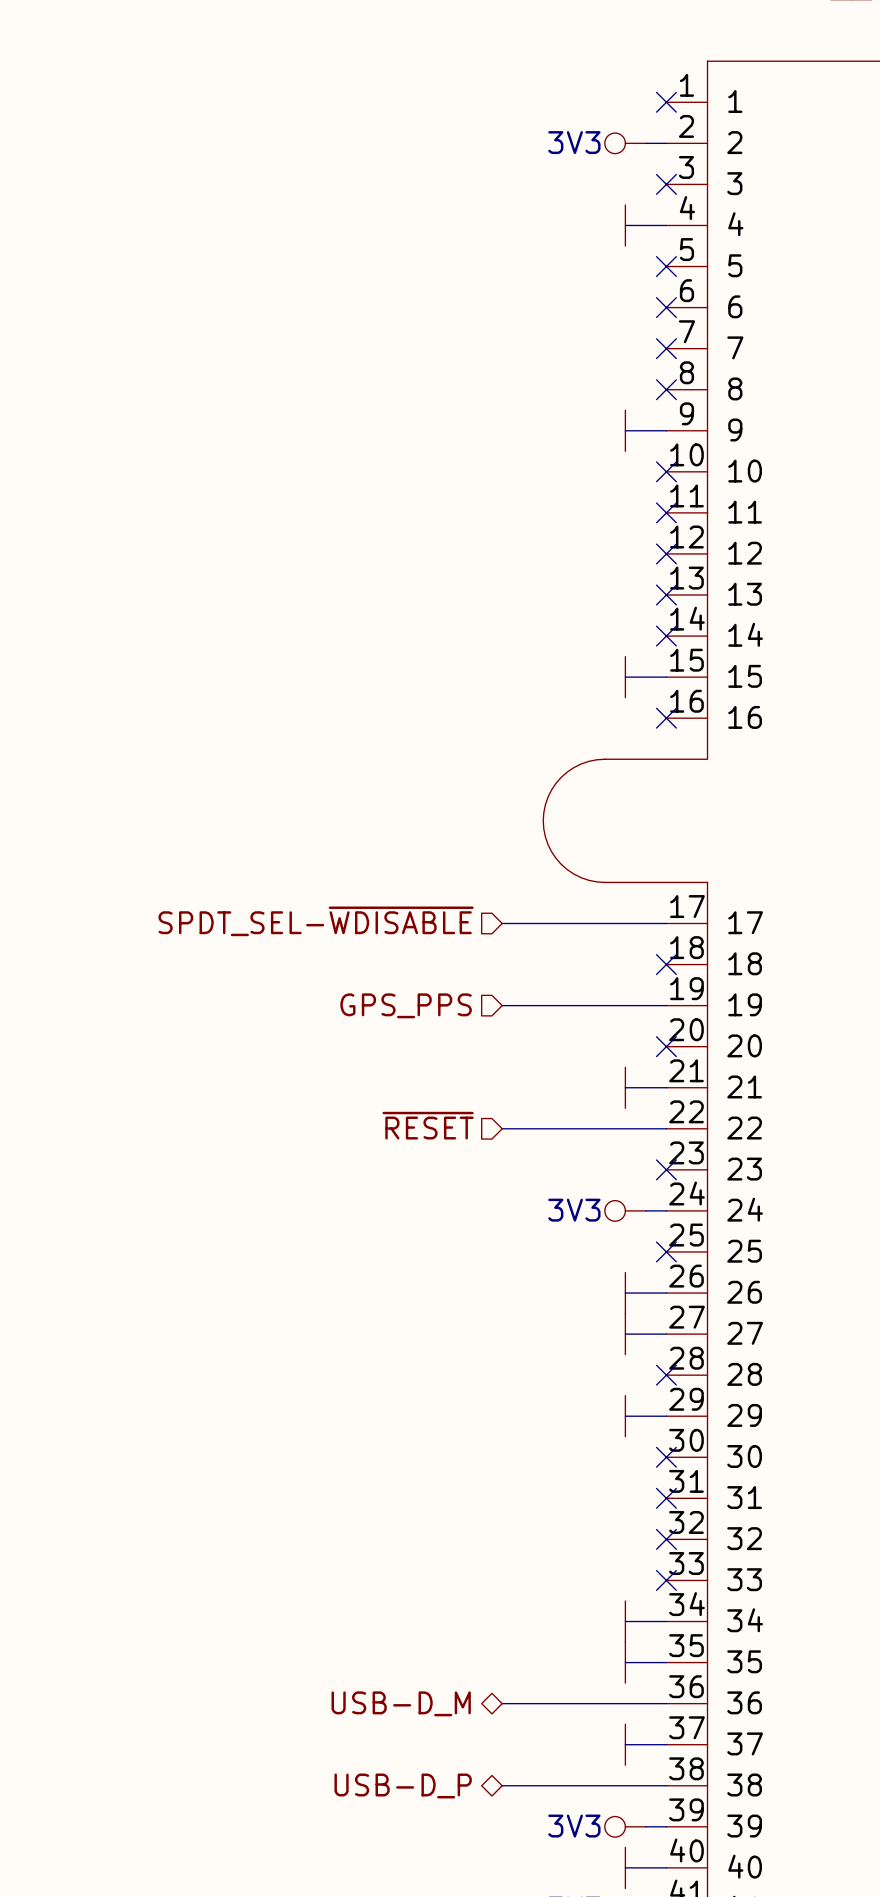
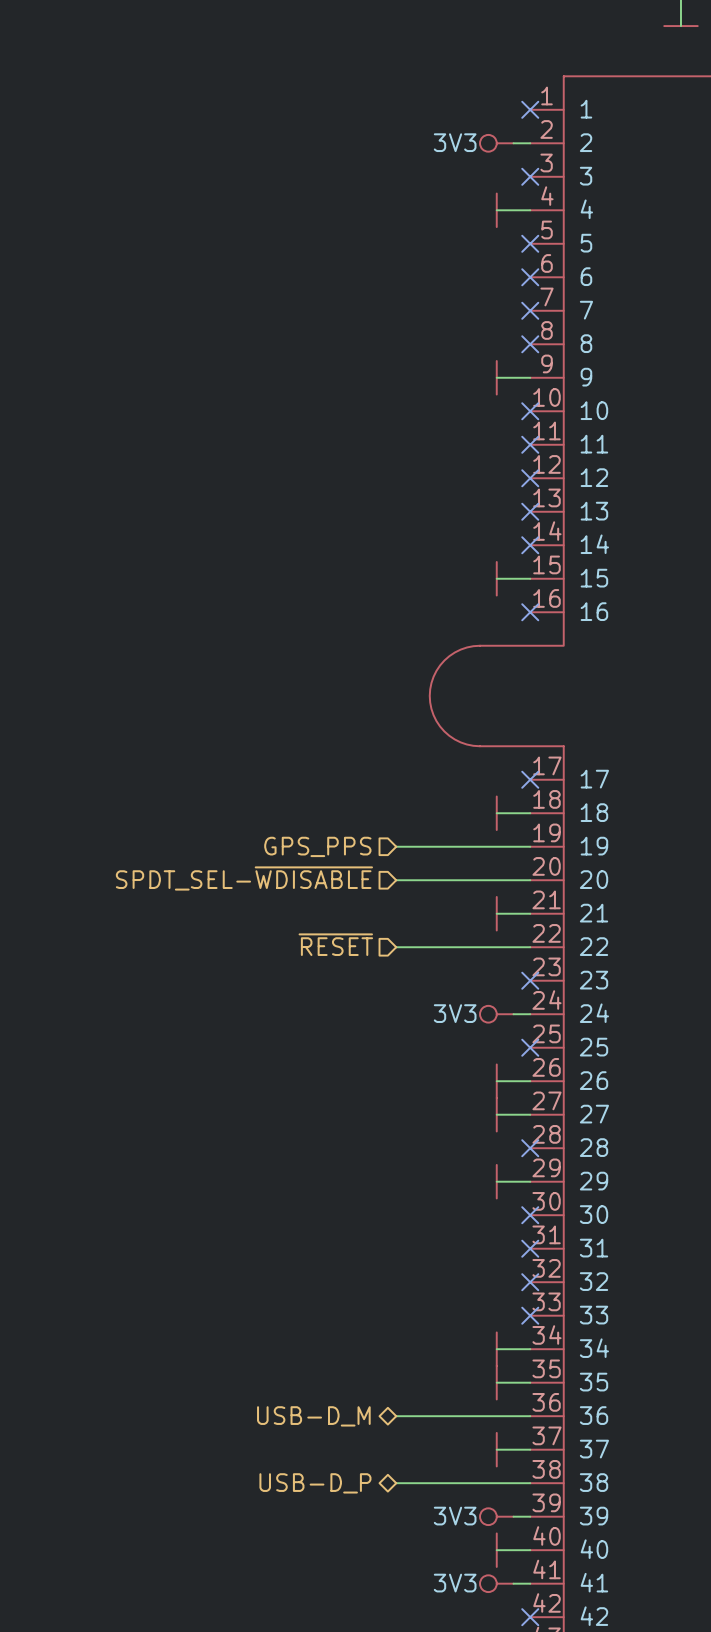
hierarchical label position: SPDT_SEL-~{WDISABLE} (316, 921) -> SPDT_SEL-~{WDISABLE} (244, 878)
wire: (502, 923) (666, 923) -> (396, 880) (530, 880)
wire: none -> (496, 813) (530, 813)
power symbol: none -> (496, 813)
no-connect mark position: (666, 964) -> (530, 779)
no-connect mark: (666, 1046) -> none

